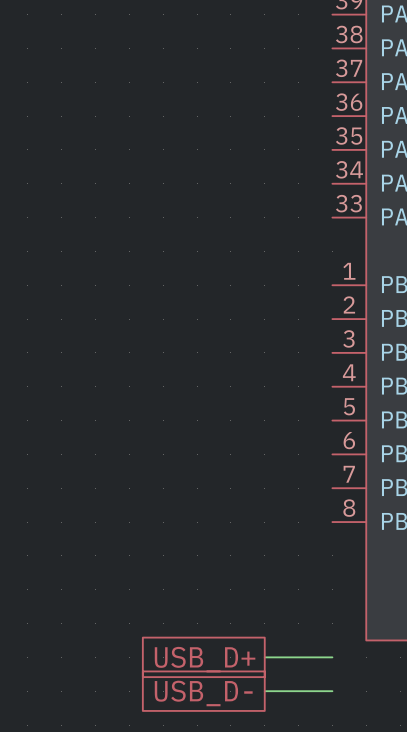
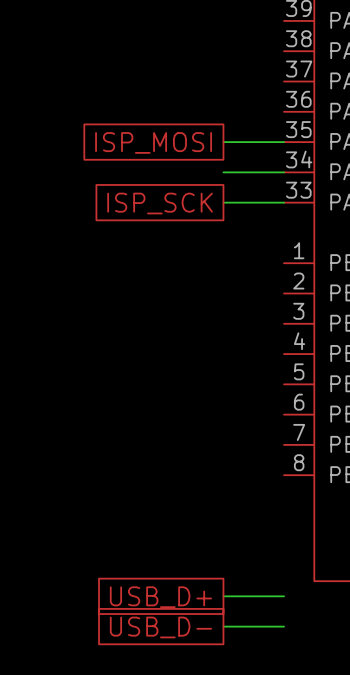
wire: none -> (223, 142) (284, 142)
global label: none -> ISP_MOSI (153, 142)
wire: none -> (223, 172) (284, 172)
wire: none -> (223, 202) (284, 202)
global label: none -> ISP_SCK (160, 203)

